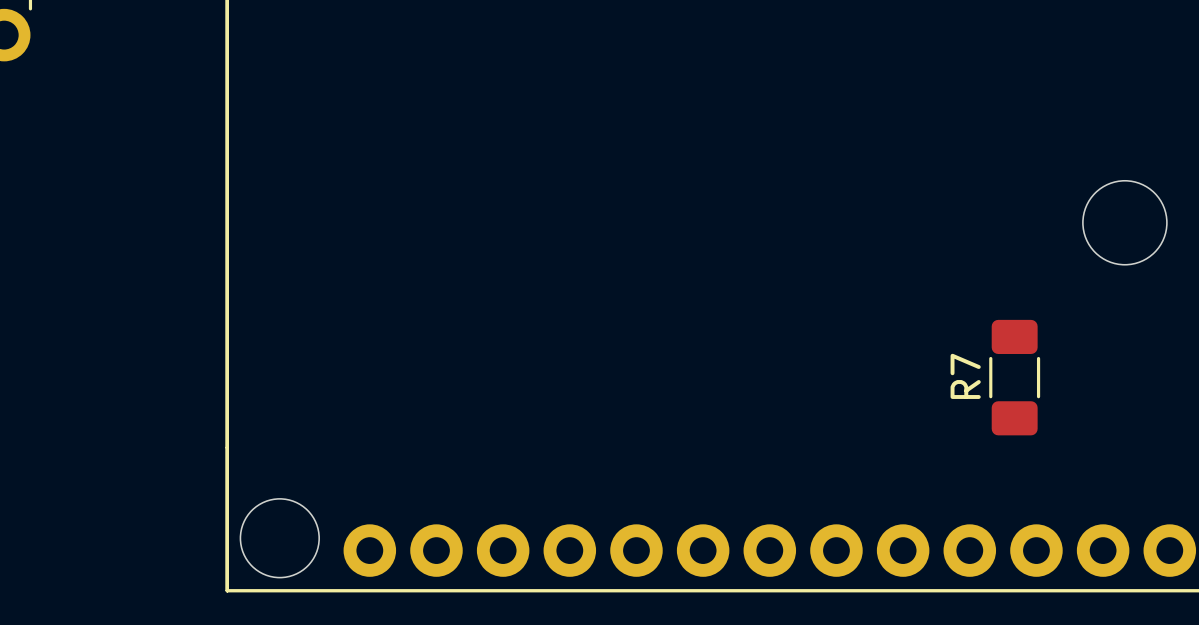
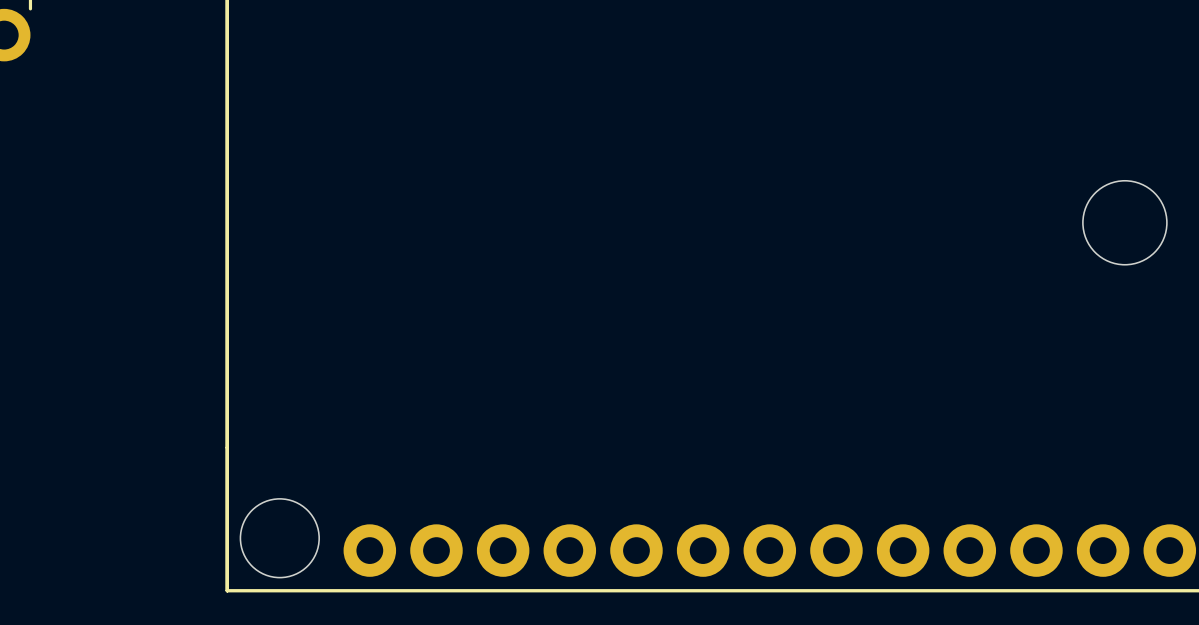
R7: (1014, 377) -> none

